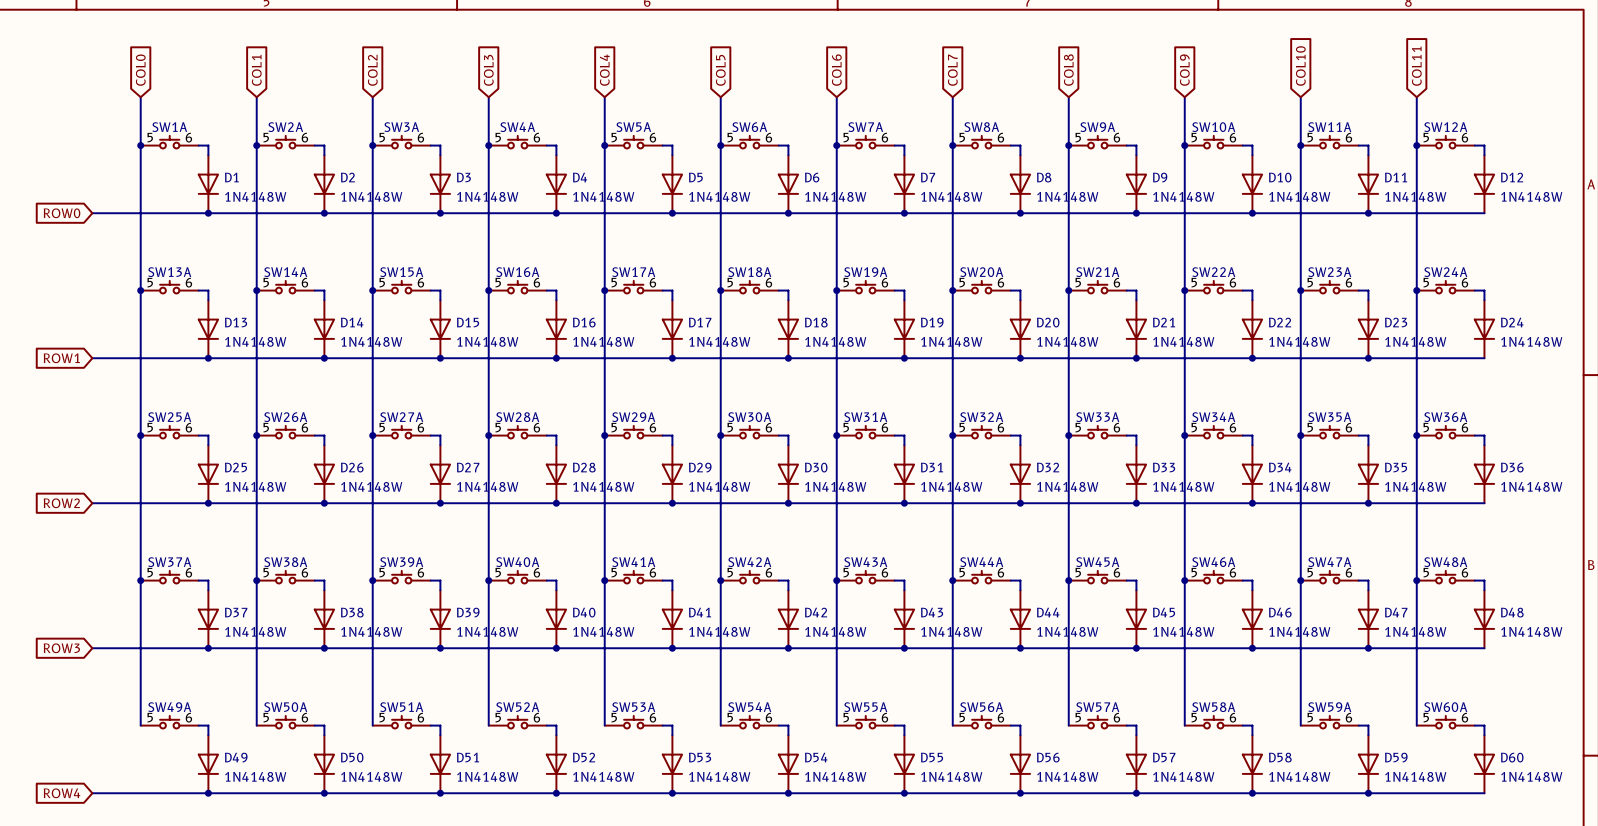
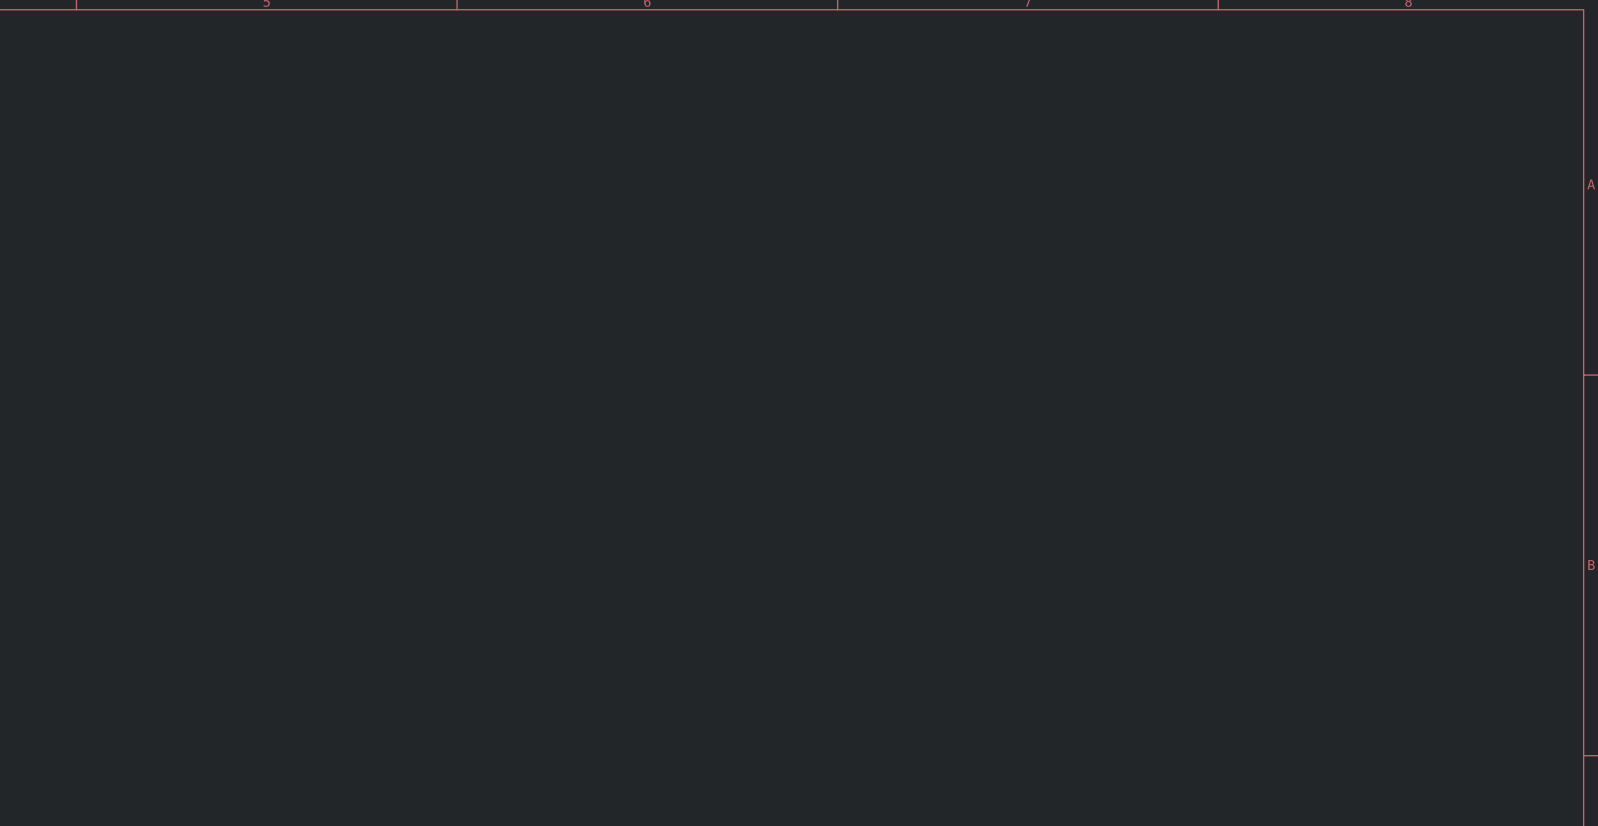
global label: COL10 (1300, 65) -> none
global label: COL11 (1416, 66) -> none
global label: COL0 (140, 70) -> none
global label: COL1 (256, 70) -> none
global label: COL2 (372, 70) -> none
global label: COL3 (488, 70) -> none
global label: COL4 (604, 70) -> none
global label: COL5 (720, 70) -> none
global label: COL6 (836, 70) -> none
global label: COL7 (952, 70) -> none
global label: COL8 (1068, 70) -> none
global label: COL9 (1184, 70) -> none
wire: (140, 97) (140, 725) -> none
wire: (256, 97) (256, 725) -> none
wire: (372, 97) (372, 725) -> none
wire: (488, 97) (488, 725) -> none
wire: (604, 97) (604, 725) -> none
wire: (720, 97) (720, 725) -> none
wire: (836, 97) (836, 725) -> none
wire: (952, 97) (952, 725) -> none
wire: (1068, 97) (1068, 725) -> none
wire: (1184, 97) (1184, 725) -> none
wire: (1300, 97) (1300, 725) -> none
wire: (1416, 97) (1416, 725) -> none
SW1A: (169, 141) -> none
SW2A: (285, 141) -> none
SW3A: (401, 141) -> none
SW4A: (517, 141) -> none
SW5A: (633, 141) -> none
SW6A: (749, 141) -> none
SW7A: (865, 141) -> none
SW8A: (981, 141) -> none
SW9A: (1097, 141) -> none
SW10A: (1213, 141) -> none
SW11A: (1329, 141) -> none
SW12A: (1445, 141) -> none
junction: (140, 145) -> none
wire: (198, 145) (208, 145) (208, 155) -> none
junction: (256, 145) -> none
wire: (314, 145) (324, 145) (324, 155) -> none
junction: (372, 145) -> none
wire: (430, 145) (440, 145) (440, 155) -> none
junction: (488, 145) -> none
wire: (546, 145) (556, 145) (556, 155) -> none
junction: (604, 145) -> none
wire: (662, 145) (672, 145) (672, 155) -> none
junction: (720, 145) -> none
wire: (778, 145) (788, 145) (788, 155) -> none
junction: (836, 145) -> none
wire: (894, 145) (904, 145) (904, 155) -> none
junction: (952, 145) -> none
wire: (1010, 145) (1020, 145) (1020, 155) -> none
junction: (1068, 145) -> none
wire: (1126, 145) (1136, 145) (1136, 155) -> none
junction: (1184, 145) -> none
wire: (1242, 145) (1252, 145) (1252, 155) -> none
junction: (1300, 145) -> none
wire: (1358, 145) (1368, 145) (1368, 155) -> none
junction: (1416, 145) -> none
wire: (1474, 145) (1484, 145) (1484, 155) -> none
D1: 1N4148W (208, 184) -> none
D2: 1N4148W (324, 184) -> none
D3: 1N4148W (440, 184) -> none
D4: 1N4148W (556, 184) -> none
D5: 1N4148W (672, 184) -> none
D6: 1N4148W (788, 184) -> none
D7: 1N4148W (904, 184) -> none
D8: 1N4148W (1020, 184) -> none
D9: 1N4148W (1136, 184) -> none
D10: 1N4148W (1252, 184) -> none
D11: 1N4148W (1368, 184) -> none
D12: 1N4148W (1484, 184) -> none
global label: ROW0 (62, 213) -> none
wire: (92, 213) (1484, 213) -> none
junction: (208, 213) -> none
junction: (324, 213) -> none
junction: (440, 213) -> none
junction: (556, 213) -> none
junction: (672, 213) -> none
junction: (788, 213) -> none
junction: (904, 213) -> none
junction: (1020, 213) -> none
junction: (1136, 213) -> none
junction: (1252, 213) -> none
junction: (1368, 213) -> none
SW13A: (169, 286) -> none
SW14A: (285, 286) -> none
SW15A: (401, 286) -> none
SW16A: (517, 286) -> none
SW17A: (633, 286) -> none
SW18A: (749, 286) -> none
SW19A: (865, 286) -> none
SW20A: (981, 286) -> none
SW21A: (1097, 286) -> none
SW22A: (1213, 286) -> none
SW23A: (1329, 286) -> none
SW24A: (1445, 286) -> none
junction: (140, 290) -> none
wire: (198, 290) (208, 290) (208, 300) -> none
junction: (256, 290) -> none
wire: (314, 290) (324, 290) (324, 300) -> none
junction: (372, 290) -> none
wire: (430, 290) (440, 290) (440, 300) -> none
junction: (488, 290) -> none
wire: (546, 290) (556, 290) (556, 300) -> none
junction: (604, 290) -> none
wire: (662, 290) (672, 290) (672, 300) -> none
junction: (720, 290) -> none
wire: (778, 290) (788, 290) (788, 300) -> none
junction: (836, 290) -> none
wire: (894, 290) (904, 290) (904, 300) -> none
junction: (952, 290) -> none
wire: (1010, 290) (1020, 290) (1020, 300) -> none
junction: (1068, 290) -> none
wire: (1126, 290) (1136, 290) (1136, 300) -> none
junction: (1184, 290) -> none
wire: (1242, 290) (1252, 290) (1252, 300) -> none
junction: (1300, 290) -> none
wire: (1358, 290) (1368, 290) (1368, 300) -> none
junction: (1416, 290) -> none
wire: (1474, 290) (1484, 290) (1484, 300) -> none
D13: 1N4148W (208, 329) -> none
D14: 1N4148W (324, 329) -> none
D15: 1N4148W (440, 329) -> none
D16: 1N4148W (556, 329) -> none
D17: 1N4148W (672, 329) -> none
D18: 1N4148W (788, 329) -> none
D19: 1N4148W (904, 329) -> none
D20: 1N4148W (1020, 329) -> none
D21: 1N4148W (1136, 329) -> none
D22: 1N4148W (1252, 329) -> none
D23: 1N4148W (1368, 329) -> none
D24: 1N4148W (1484, 329) -> none
global label: ROW1 (61, 358) -> none
wire: (92, 358) (1484, 358) -> none
junction: (208, 358) -> none
junction: (324, 358) -> none
junction: (440, 358) -> none
junction: (556, 358) -> none
junction: (672, 358) -> none
junction: (788, 358) -> none
junction: (904, 358) -> none
junction: (1020, 358) -> none
junction: (1136, 358) -> none
junction: (1252, 358) -> none
junction: (1368, 358) -> none
SW25A: (169, 431) -> none
SW26A: (285, 431) -> none
SW27A: (401, 431) -> none
SW28A: (517, 431) -> none
SW29A: (633, 431) -> none
SW30A: (749, 431) -> none
SW31A: (865, 431) -> none
SW32A: (981, 431) -> none
SW33A: (1097, 431) -> none
SW34A: (1213, 431) -> none
SW35A: (1329, 431) -> none
SW36A: (1445, 431) -> none
junction: (140, 435) -> none
wire: (198, 435) (208, 435) (208, 445) -> none
junction: (256, 435) -> none
wire: (314, 435) (324, 435) (324, 445) -> none
junction: (372, 435) -> none
wire: (430, 435) (440, 435) (440, 445) -> none
junction: (488, 435) -> none
wire: (546, 435) (556, 435) (556, 445) -> none
junction: (604, 435) -> none
wire: (662, 435) (672, 435) (672, 445) -> none
junction: (720, 435) -> none
wire: (778, 435) (788, 435) (788, 445) -> none
junction: (836, 435) -> none
wire: (894, 435) (904, 435) (904, 445) -> none
junction: (952, 435) -> none
wire: (1010, 435) (1020, 435) (1020, 445) -> none
junction: (1068, 435) -> none
wire: (1126, 435) (1136, 435) (1136, 445) -> none
junction: (1184, 435) -> none
wire: (1242, 435) (1252, 435) (1252, 445) -> none
junction: (1300, 435) -> none
wire: (1358, 435) (1368, 435) (1368, 445) -> none
junction: (1416, 435) -> none
wire: (1474, 435) (1484, 435) (1484, 445) -> none
D25: 1N4148W (208, 474) -> none
D26: 1N4148W (324, 474) -> none
D27: 1N4148W (440, 474) -> none
D28: 1N4148W (556, 474) -> none
D29: 1N4148W (672, 474) -> none
D30: 1N4148W (788, 474) -> none
D31: 1N4148W (904, 474) -> none
D32: 1N4148W (1020, 474) -> none
D33: 1N4148W (1136, 474) -> none
D34: 1N4148W (1252, 474) -> none
D35: 1N4148W (1368, 474) -> none
D36: 1N4148W (1484, 474) -> none
global label: ROW2 (61, 503) -> none
wire: (92, 503) (1484, 503) -> none
junction: (208, 503) -> none
junction: (324, 503) -> none
junction: (440, 503) -> none
junction: (556, 503) -> none
junction: (672, 503) -> none
junction: (788, 503) -> none
junction: (904, 503) -> none
junction: (1020, 503) -> none
junction: (1136, 503) -> none
junction: (1252, 503) -> none
junction: (1368, 503) -> none
SW37A: (169, 576) -> none
SW38A: (285, 576) -> none
SW39A: (401, 576) -> none
SW40A: (517, 576) -> none
SW41A: (633, 576) -> none
SW42A: (749, 576) -> none
SW43A: (865, 576) -> none
SW44A: (981, 576) -> none
SW45A: (1097, 576) -> none
SW46A: (1213, 576) -> none
SW47A: (1329, 576) -> none
SW48A: (1445, 576) -> none
junction: (140, 580) -> none
wire: (198, 580) (208, 580) (208, 590) -> none
junction: (256, 580) -> none
wire: (314, 580) (324, 580) (324, 590) -> none
junction: (372, 580) -> none
wire: (430, 580) (440, 580) (440, 590) -> none
junction: (488, 580) -> none
wire: (546, 580) (556, 580) (556, 590) -> none
junction: (604, 580) -> none
wire: (662, 580) (672, 580) (672, 590) -> none
junction: (720, 580) -> none
wire: (778, 580) (788, 580) (788, 590) -> none
junction: (836, 580) -> none
wire: (894, 580) (904, 580) (904, 590) -> none
junction: (952, 580) -> none
wire: (1010, 580) (1020, 580) (1020, 590) -> none
junction: (1068, 580) -> none
wire: (1126, 580) (1136, 580) (1136, 590) -> none
junction: (1184, 580) -> none
wire: (1242, 580) (1252, 580) (1252, 590) -> none
junction: (1300, 580) -> none
wire: (1358, 580) (1368, 580) (1368, 590) -> none
junction: (1416, 580) -> none
wire: (1474, 580) (1484, 580) (1484, 590) -> none
D37: 1N4148W (208, 619) -> none
D38: 1N4148W (324, 619) -> none
D39: 1N4148W (440, 619) -> none
D40: 1N4148W (556, 619) -> none
D41: 1N4148W (672, 619) -> none
D42: 1N4148W (788, 619) -> none
D43: 1N4148W (904, 619) -> none
D44: 1N4148W (1020, 619) -> none
D45: 1N4148W (1136, 619) -> none
D46: 1N4148W (1252, 619) -> none
D47: 1N4148W (1368, 619) -> none
D48: 1N4148W (1484, 619) -> none
global label: ROW3 (61, 648) -> none
wire: (92, 648) (1484, 648) -> none
junction: (208, 648) -> none
junction: (324, 648) -> none
junction: (440, 648) -> none
junction: (556, 648) -> none
junction: (672, 648) -> none
junction: (788, 648) -> none
junction: (904, 648) -> none
junction: (1020, 648) -> none
junction: (1136, 648) -> none
junction: (1252, 648) -> none
junction: (1368, 648) -> none
SW49A: (169, 721) -> none
SW50A: (285, 721) -> none
SW51A: (401, 721) -> none
SW52A: (517, 721) -> none
SW53A: (633, 721) -> none
SW54A: (749, 721) -> none
SW55A: (865, 721) -> none
SW56A: (981, 721) -> none
SW57A: (1097, 721) -> none
SW58A: (1213, 721) -> none
SW59A: (1329, 721) -> none
SW60A: (1445, 721) -> none
wire: (198, 725) (208, 725) (208, 735) -> none
wire: (314, 725) (324, 725) (324, 735) -> none
wire: (430, 725) (440, 725) (440, 735) -> none
wire: (546, 725) (556, 725) (556, 735) -> none
wire: (662, 725) (672, 725) (672, 735) -> none
wire: (778, 725) (788, 725) (788, 735) -> none
wire: (894, 725) (904, 725) (904, 735) -> none
wire: (1010, 725) (1020, 725) (1020, 735) -> none
wire: (1126, 725) (1136, 725) (1136, 735) -> none
wire: (1242, 725) (1252, 725) (1252, 735) -> none
wire: (1358, 725) (1368, 725) (1368, 735) -> none
wire: (1474, 725) (1484, 725) (1484, 735) -> none
D49: 1N4148W (208, 764) -> none
D50: 1N4148W (324, 764) -> none
D51: 1N4148W (440, 764) -> none
D52: 1N4148W (556, 764) -> none
D53: 1N4148W (672, 764) -> none
D54: 1N4148W (788, 764) -> none
D55: 1N4148W (904, 764) -> none
D56: 1N4148W (1020, 764) -> none
D57: 1N4148W (1136, 764) -> none
D58: 1N4148W (1252, 764) -> none
D59: 1N4148W (1368, 764) -> none
D60: 1N4148W (1484, 764) -> none
global label: ROW4 (61, 793) -> none
wire: (92, 793) (1484, 793) -> none
junction: (208, 793) -> none
junction: (324, 793) -> none
junction: (440, 793) -> none
junction: (556, 793) -> none
junction: (672, 793) -> none
junction: (788, 793) -> none
junction: (904, 793) -> none
junction: (1020, 793) -> none
junction: (1136, 793) -> none
junction: (1252, 793) -> none
junction: (1368, 793) -> none

